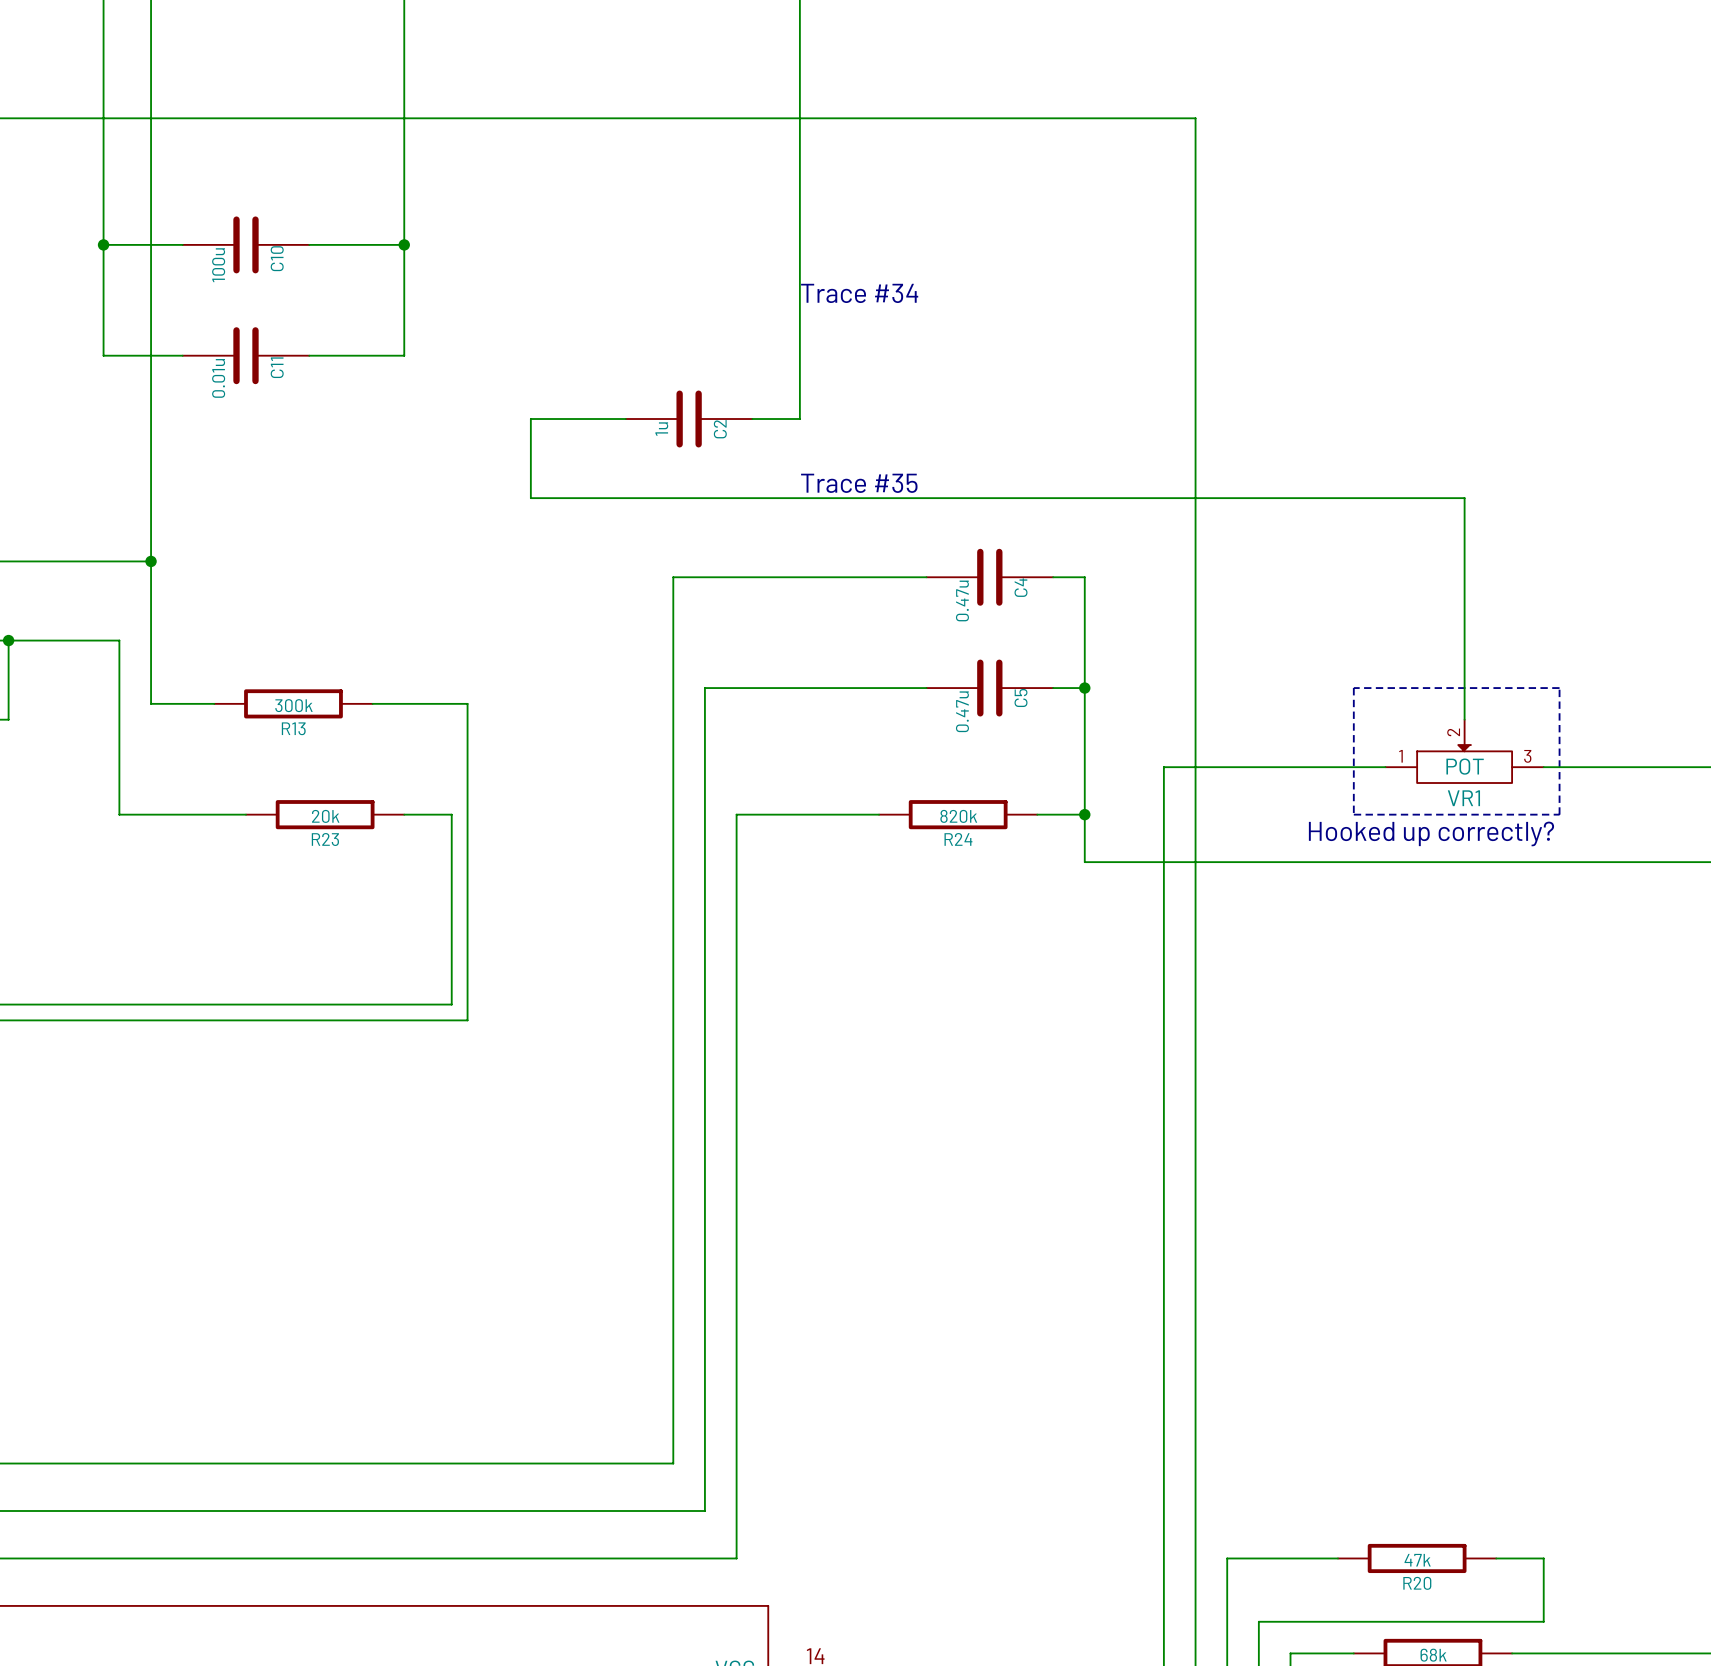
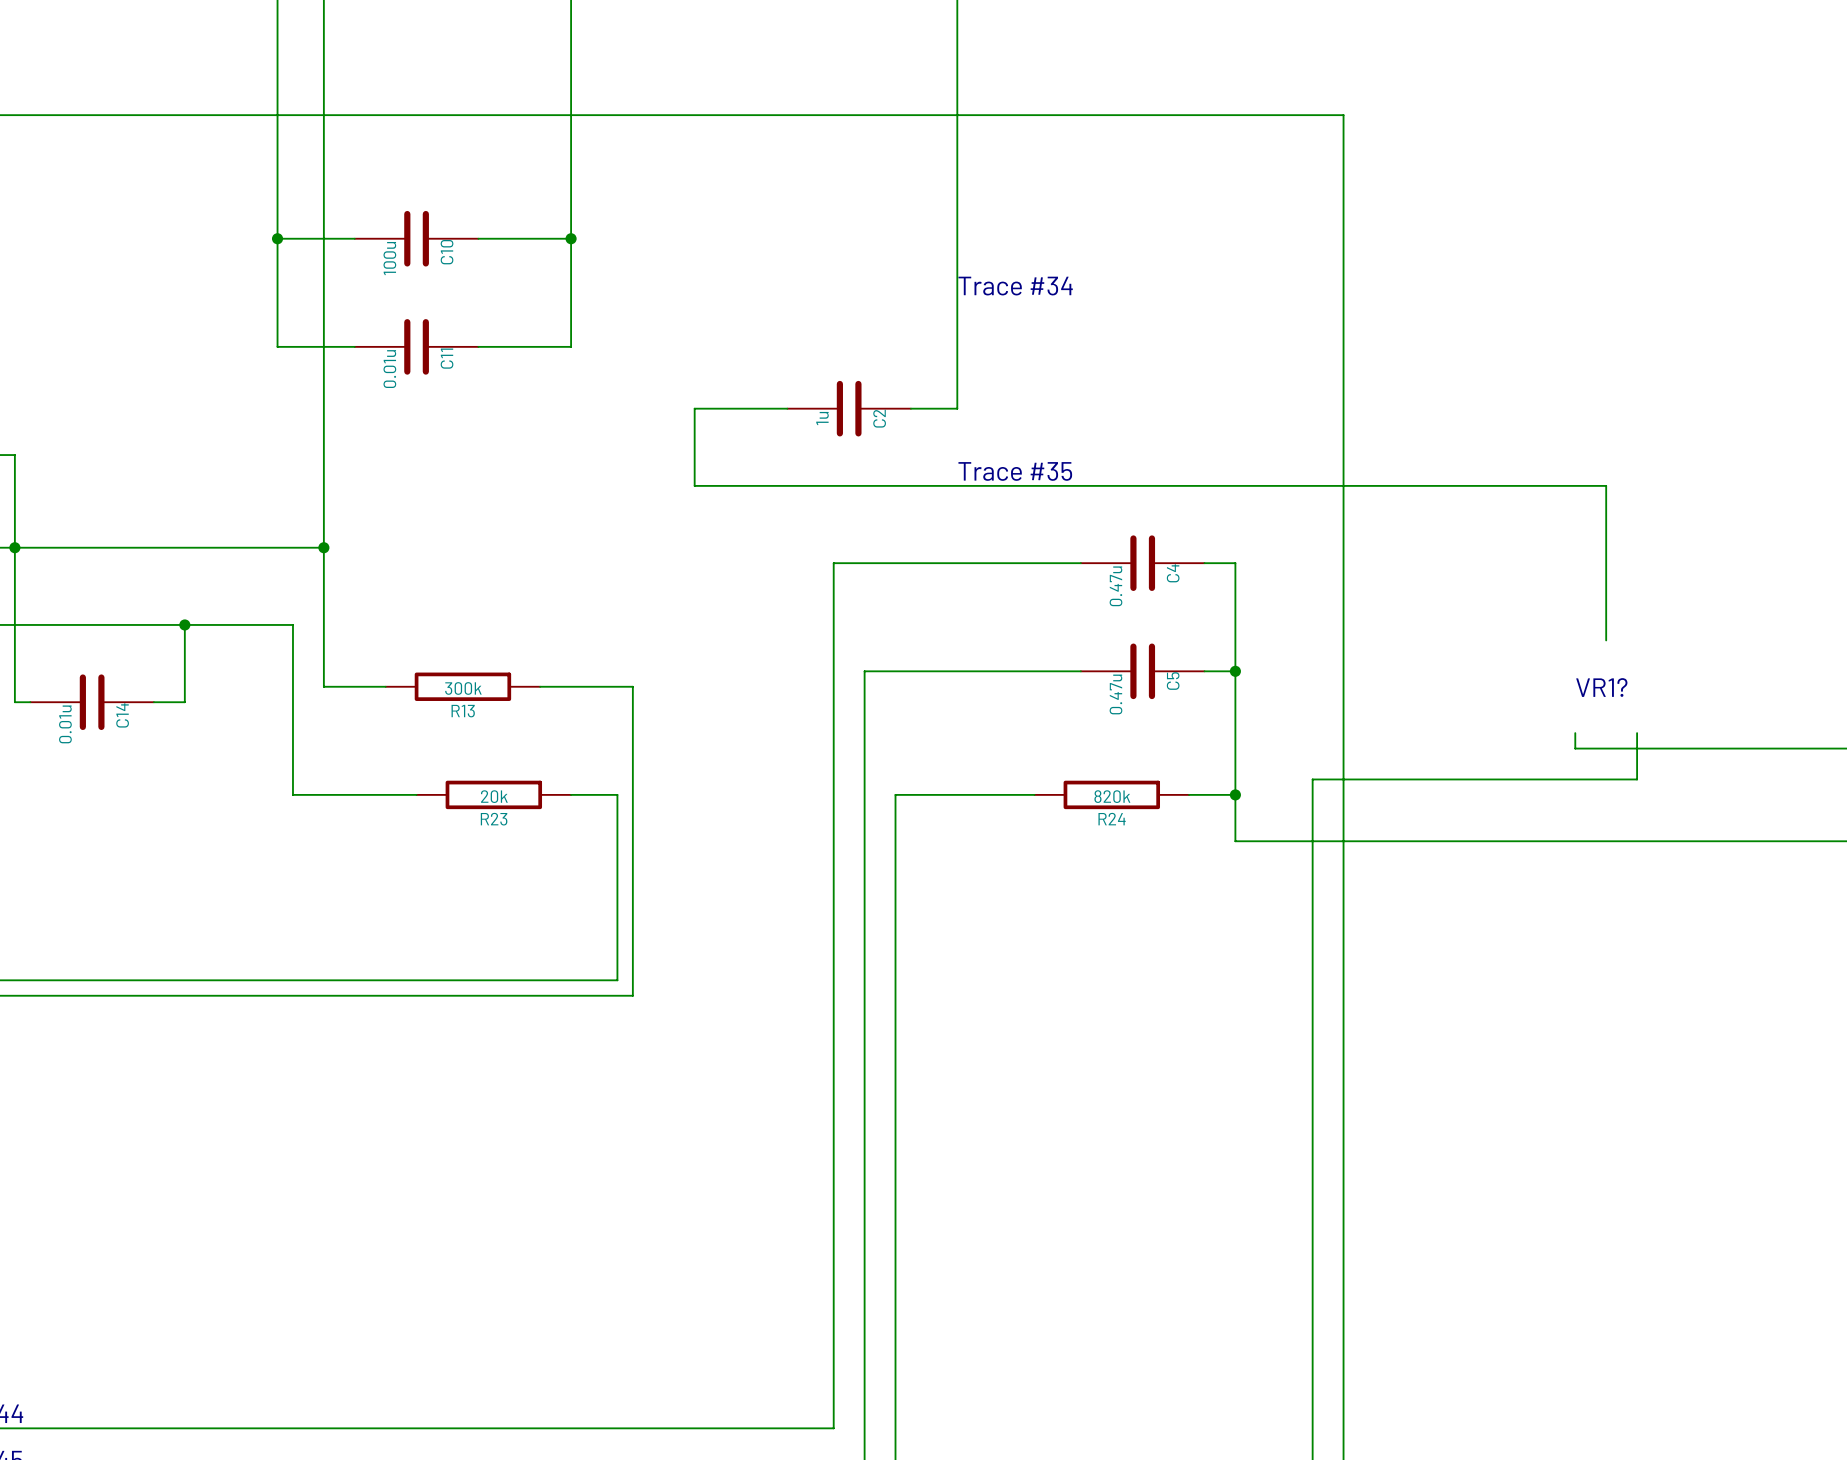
wire: (1464, 656) (1464, 719) -> none
line: (1353, 688) (1353, 814) (1559, 814) (1559, 688) (1353, 688) -> none
text: none -> VR1? (1601, 687)
wire: none -> (1575, 733) (1575, 748) (1683, 748)
VR1: POT (1464, 751) -> none
wire: (1385, 767) (1163, 767) (1163, 798) -> (1637, 733) (1637, 779) (1312, 779)
text: Hooked up correctly? (1431, 833) -> none

